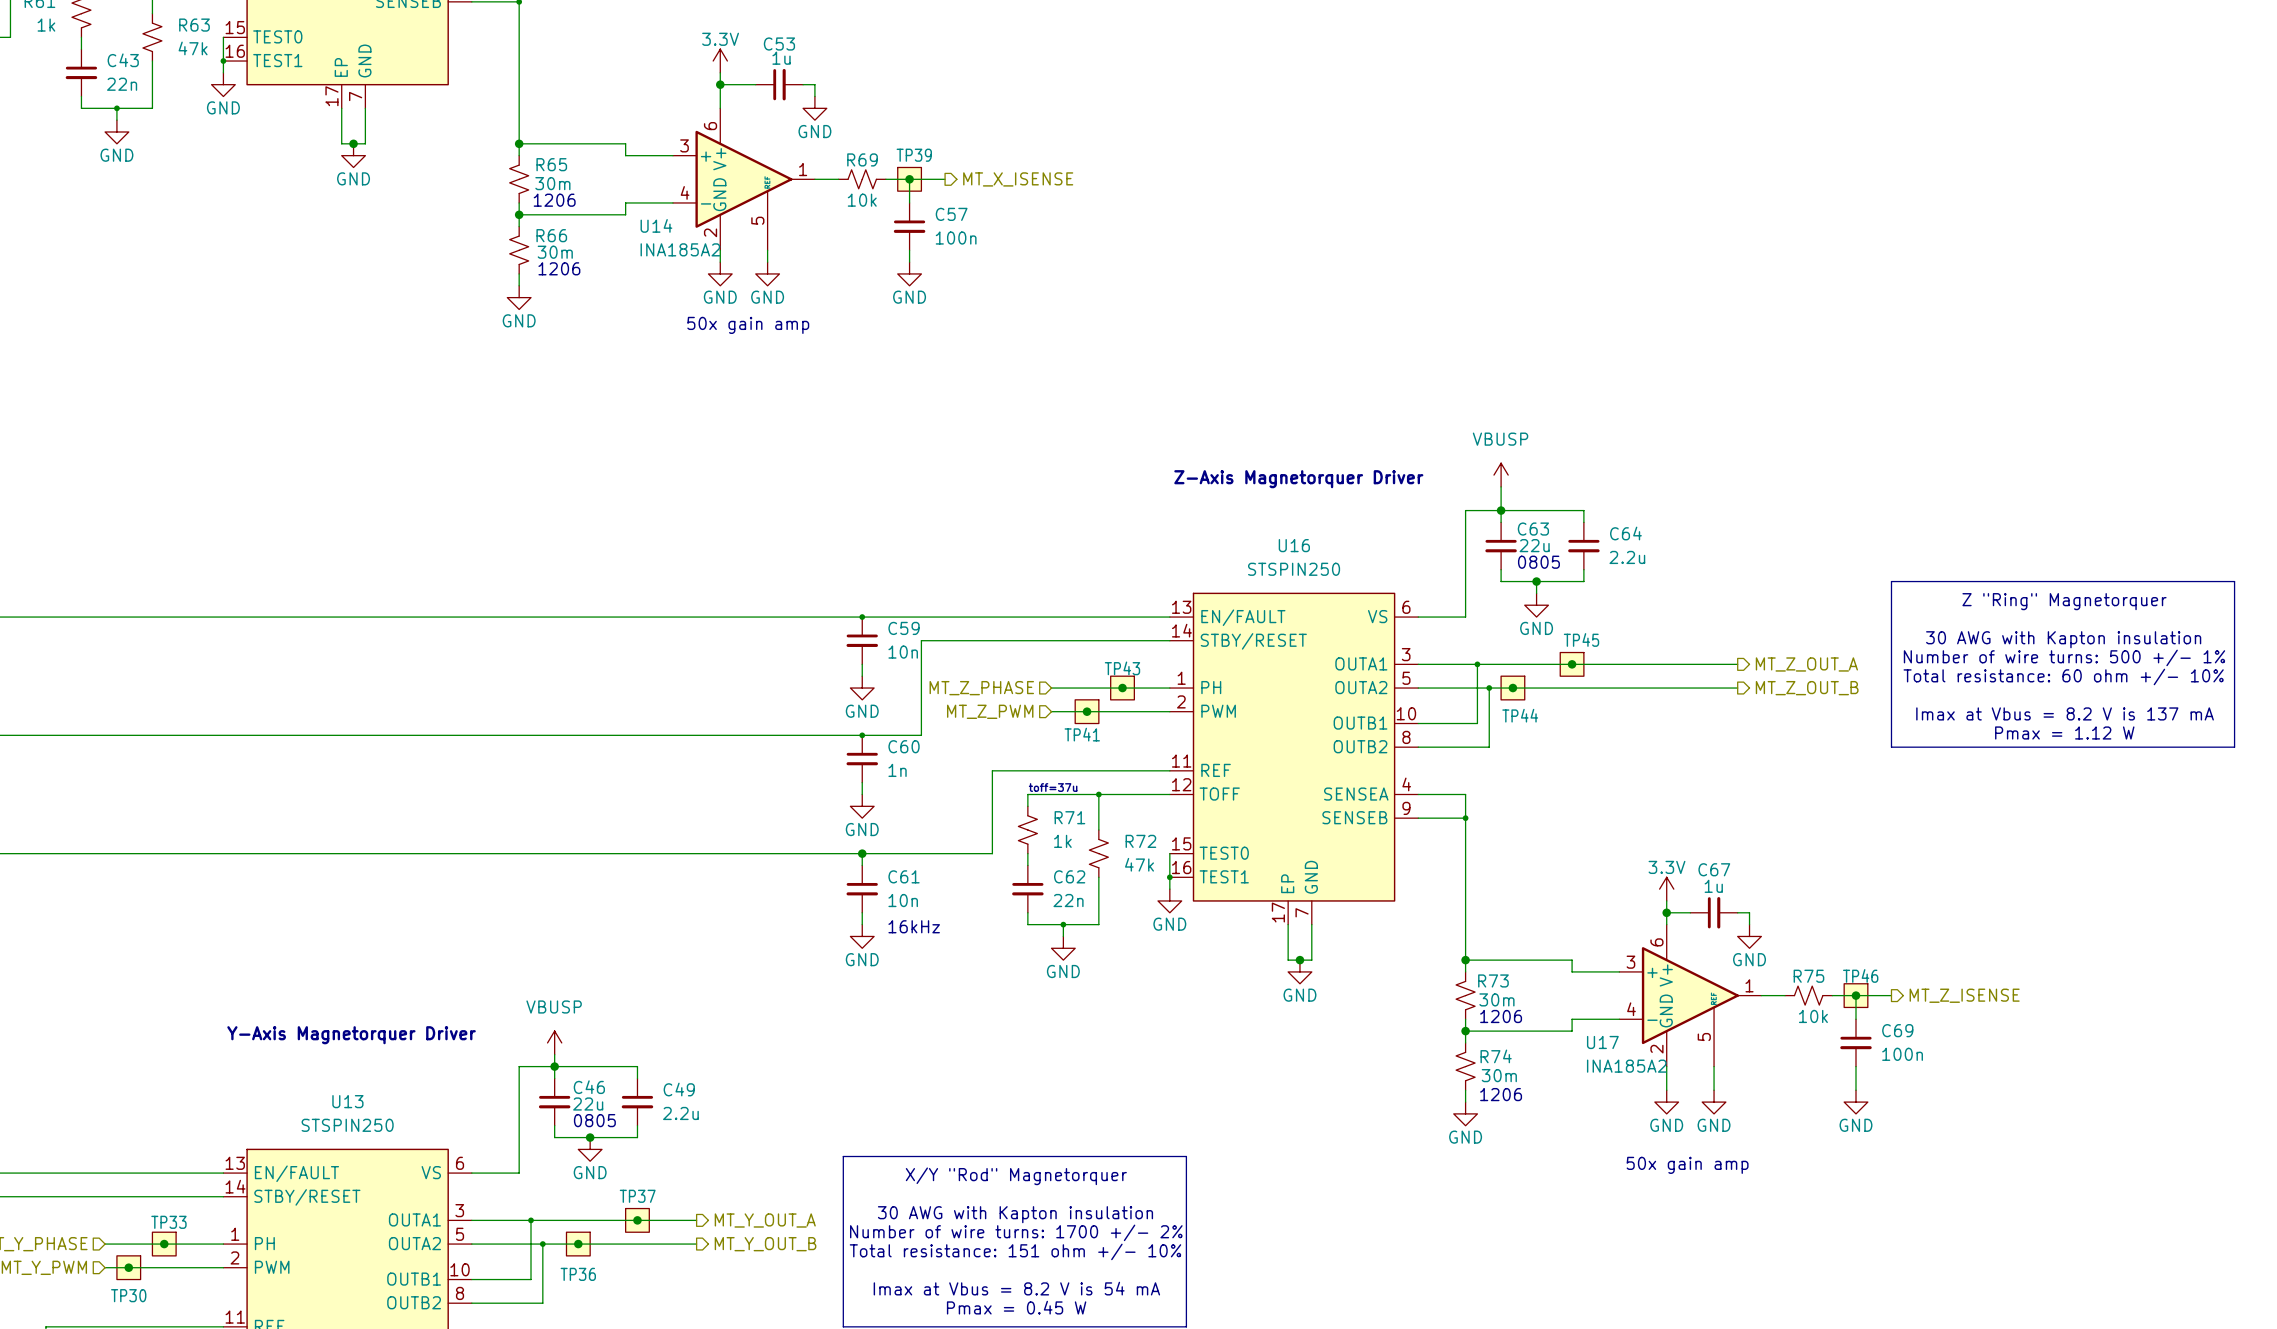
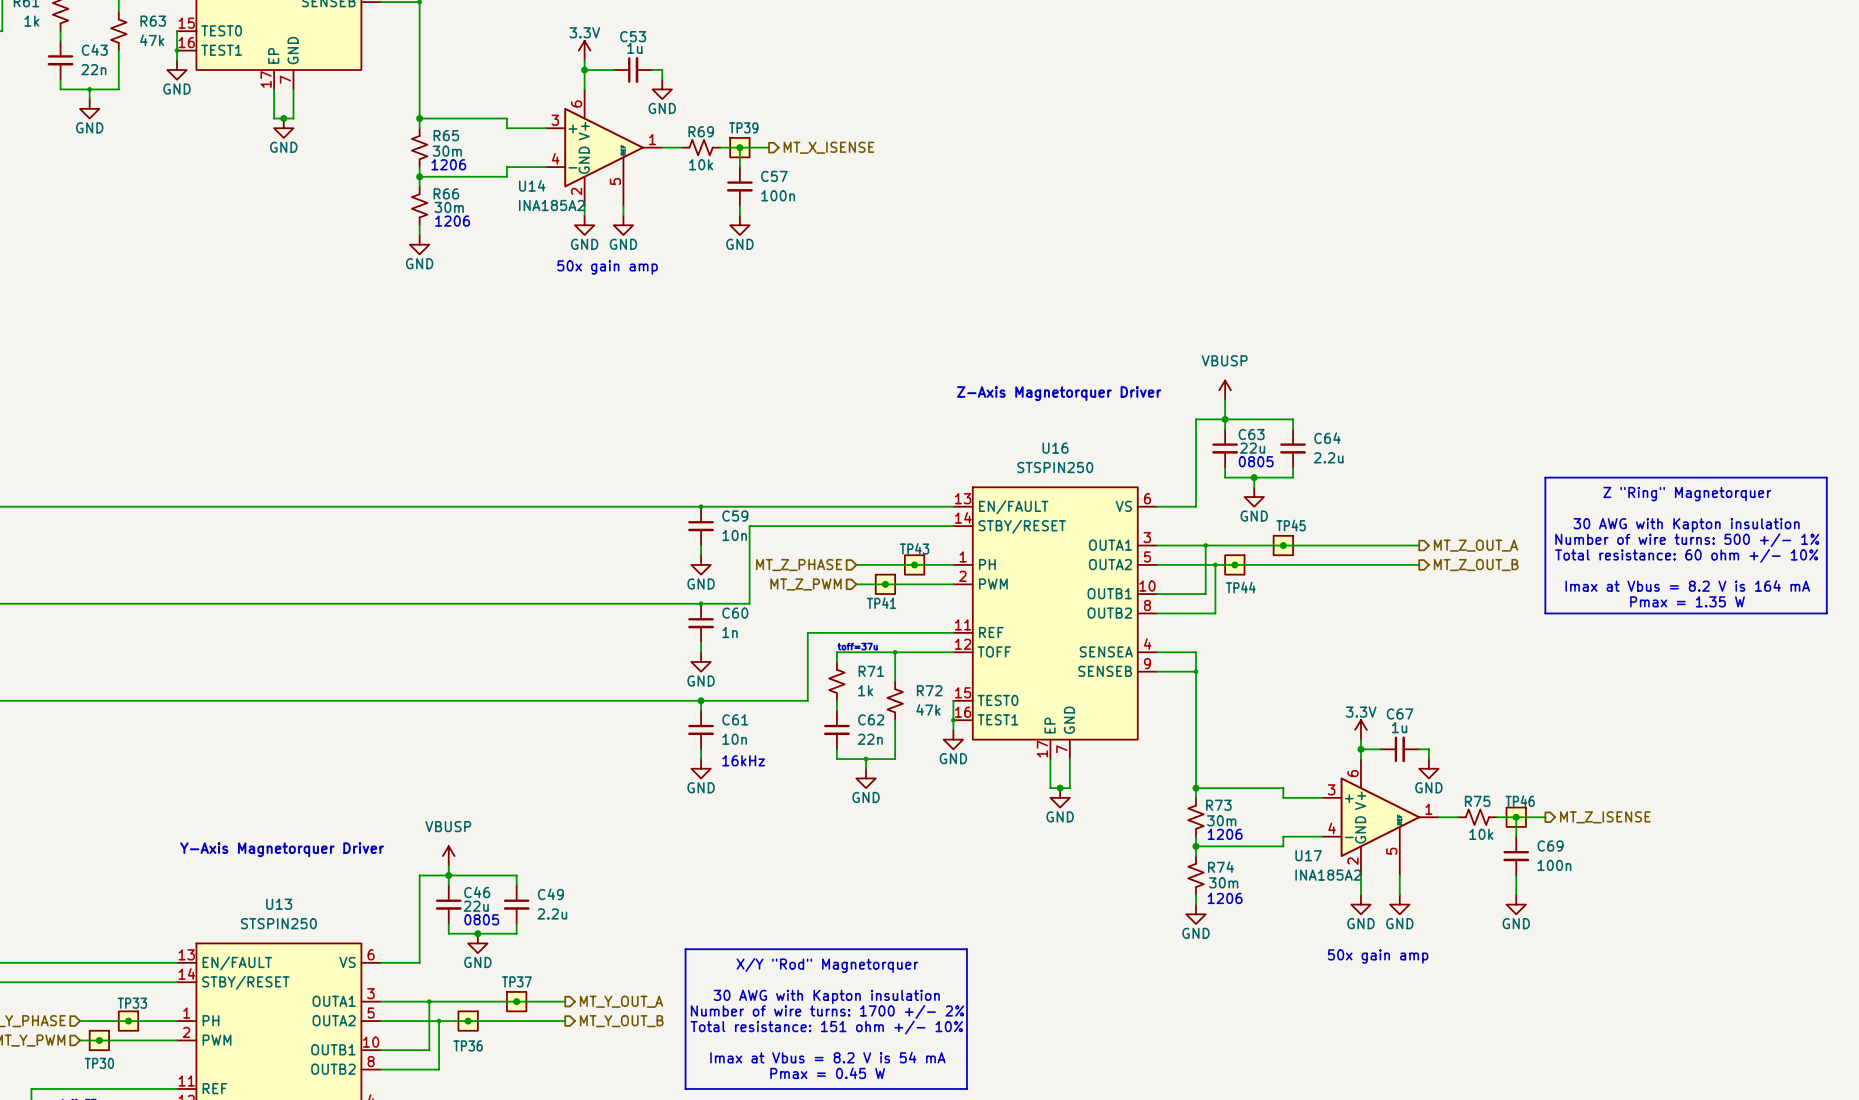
text: Imax at Vbus = 8.2 V is 137 mA (2065, 713) -> Imax at Vbus = 8.2 V is 164 mA (1687, 585)
text: Pmax = 1.12 W (2064, 732) -> Pmax = 1.35 W (1687, 601)

